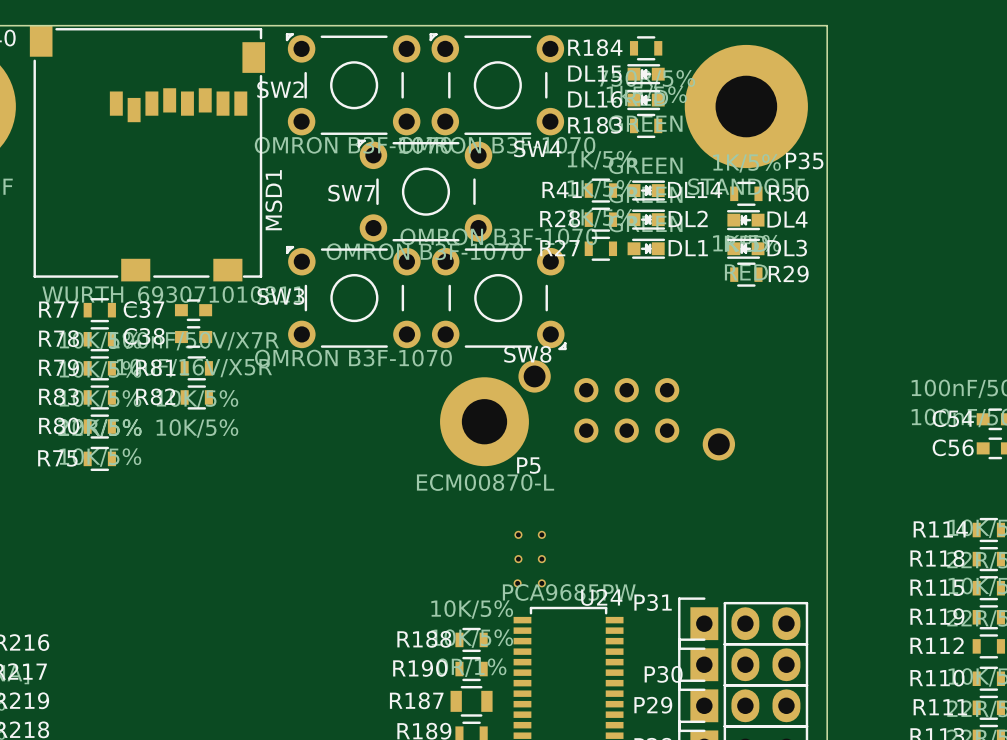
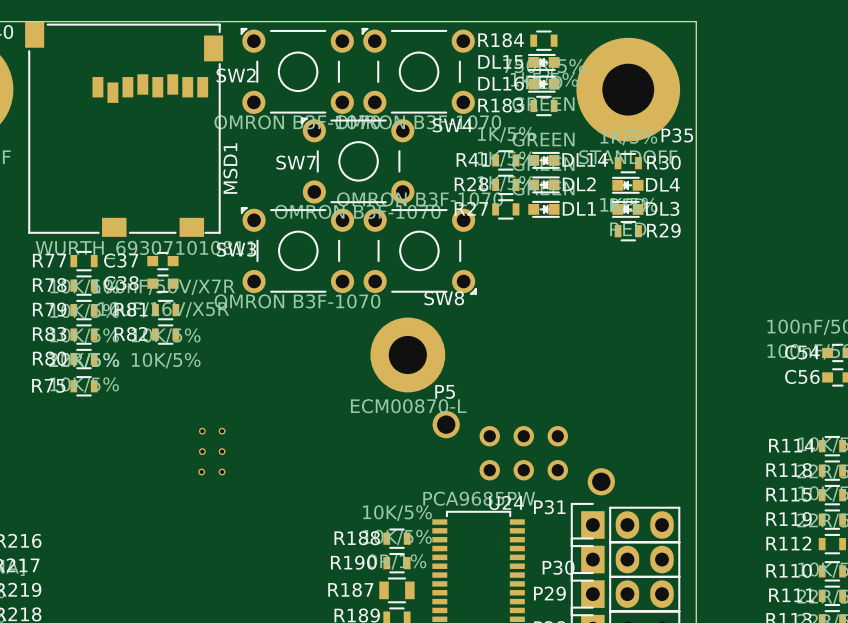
part position: (626, 410) -> (523, 453)
part position: (529, 559) -> (211, 451)

